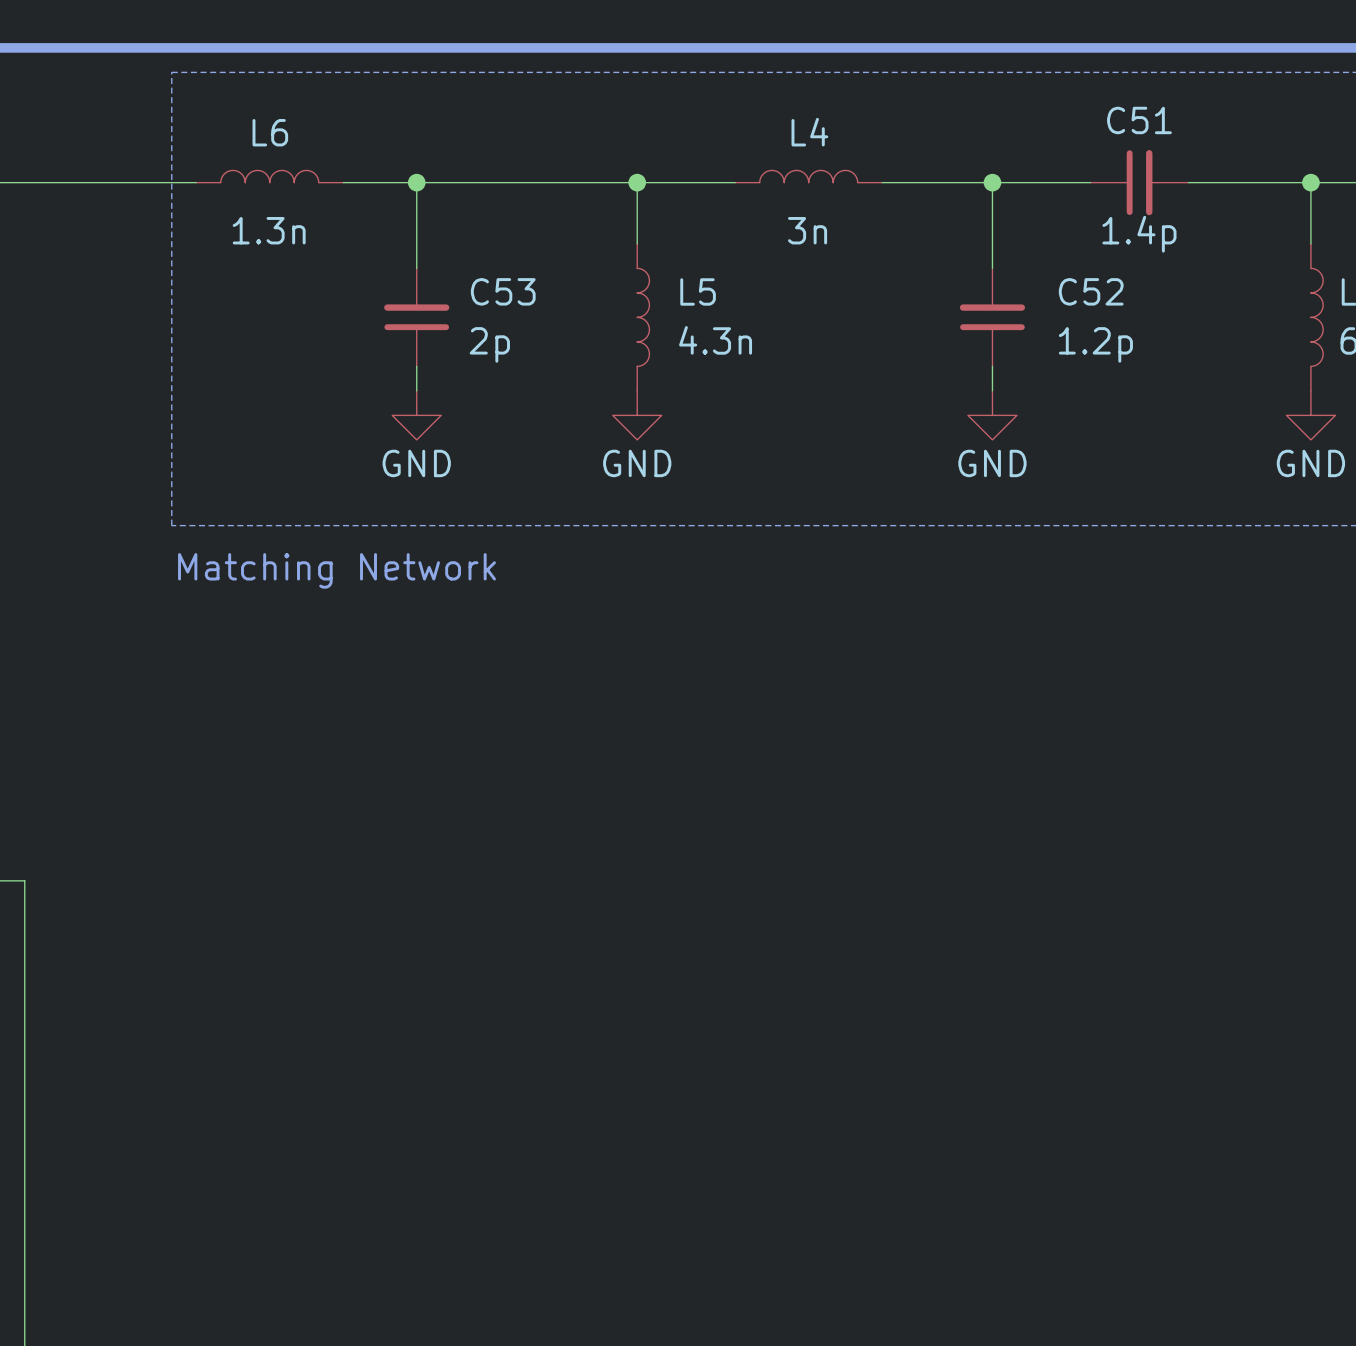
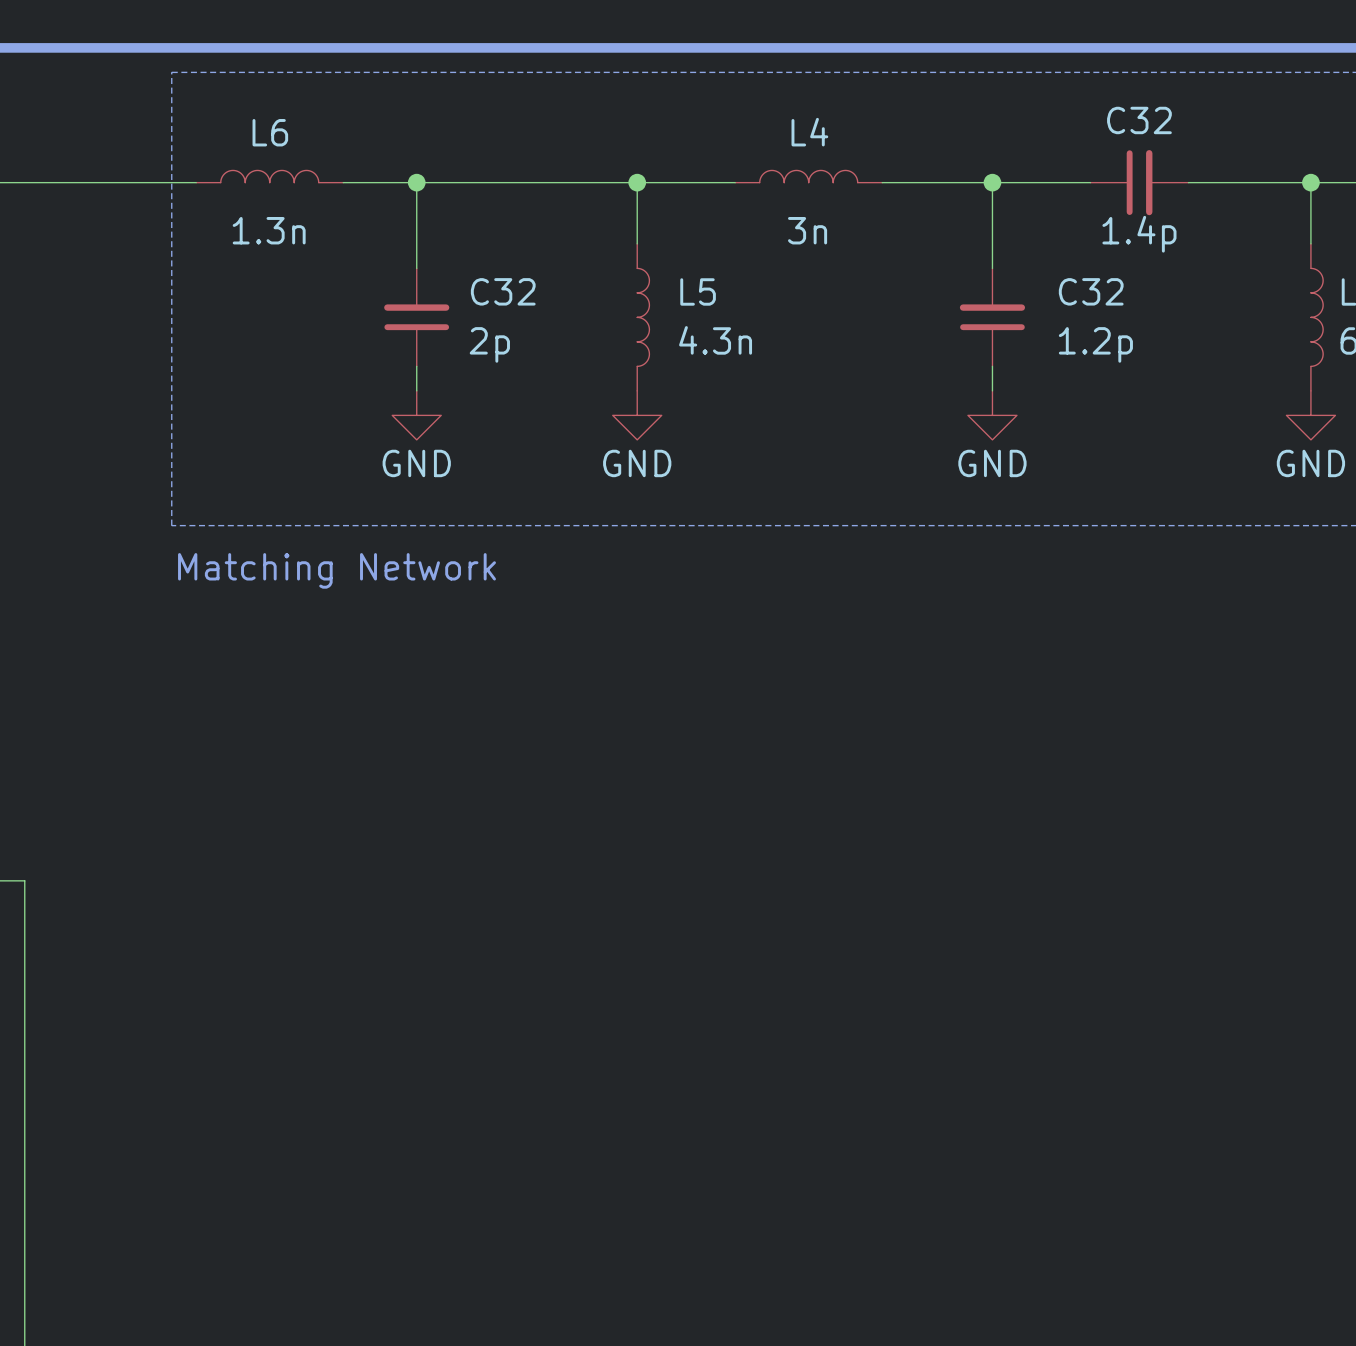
C51 name: C51 (1139, 120) -> C32 (1139, 120)
C53 name: C53 (503, 291) -> C32 (503, 291)
C52 name: C52 (1091, 291) -> C32 (1091, 291)

